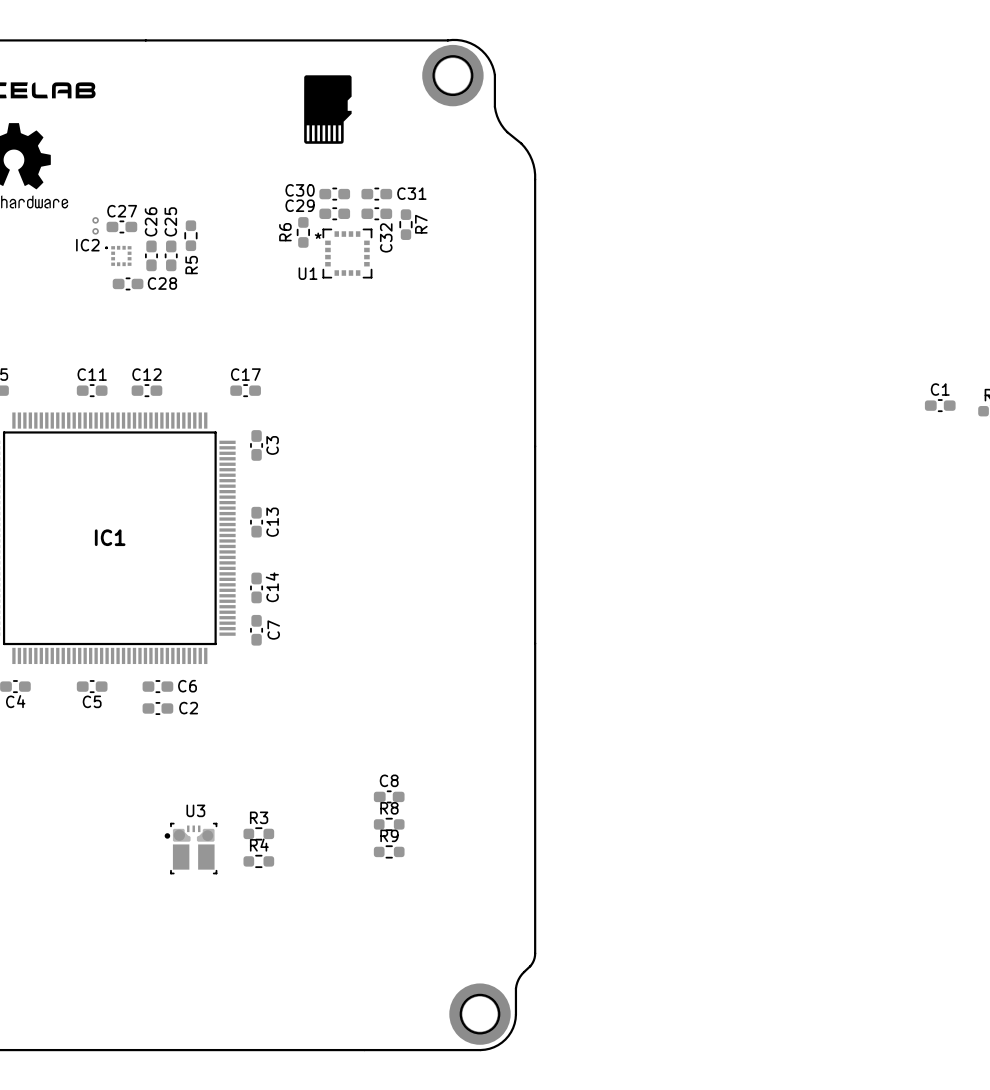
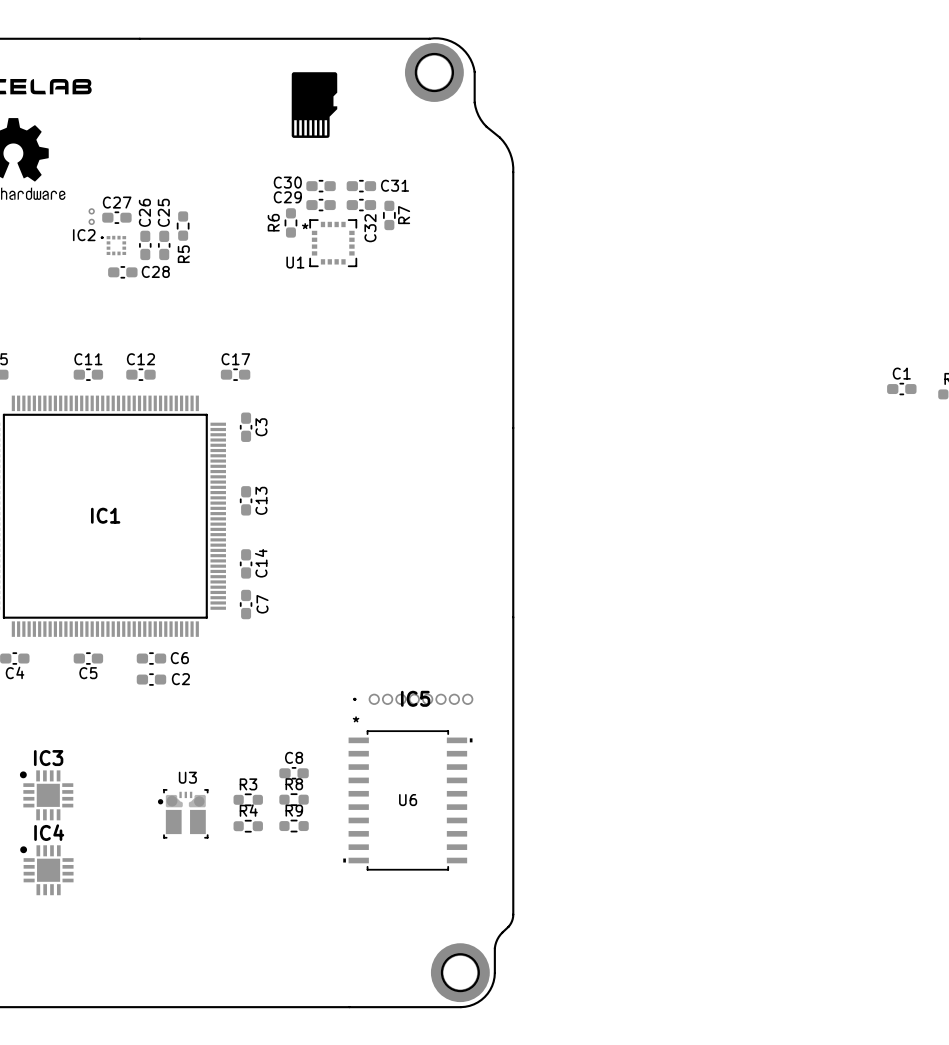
IC5: none -> (413, 699)
C8 position: (389, 796) -> (294, 773)
R8 position: (389, 824) -> (294, 799)
IC3: none -> (46, 795)
U6: none -> (407, 800)
R9 position: (389, 851) -> (294, 826)
IC4: none -> (46, 870)

